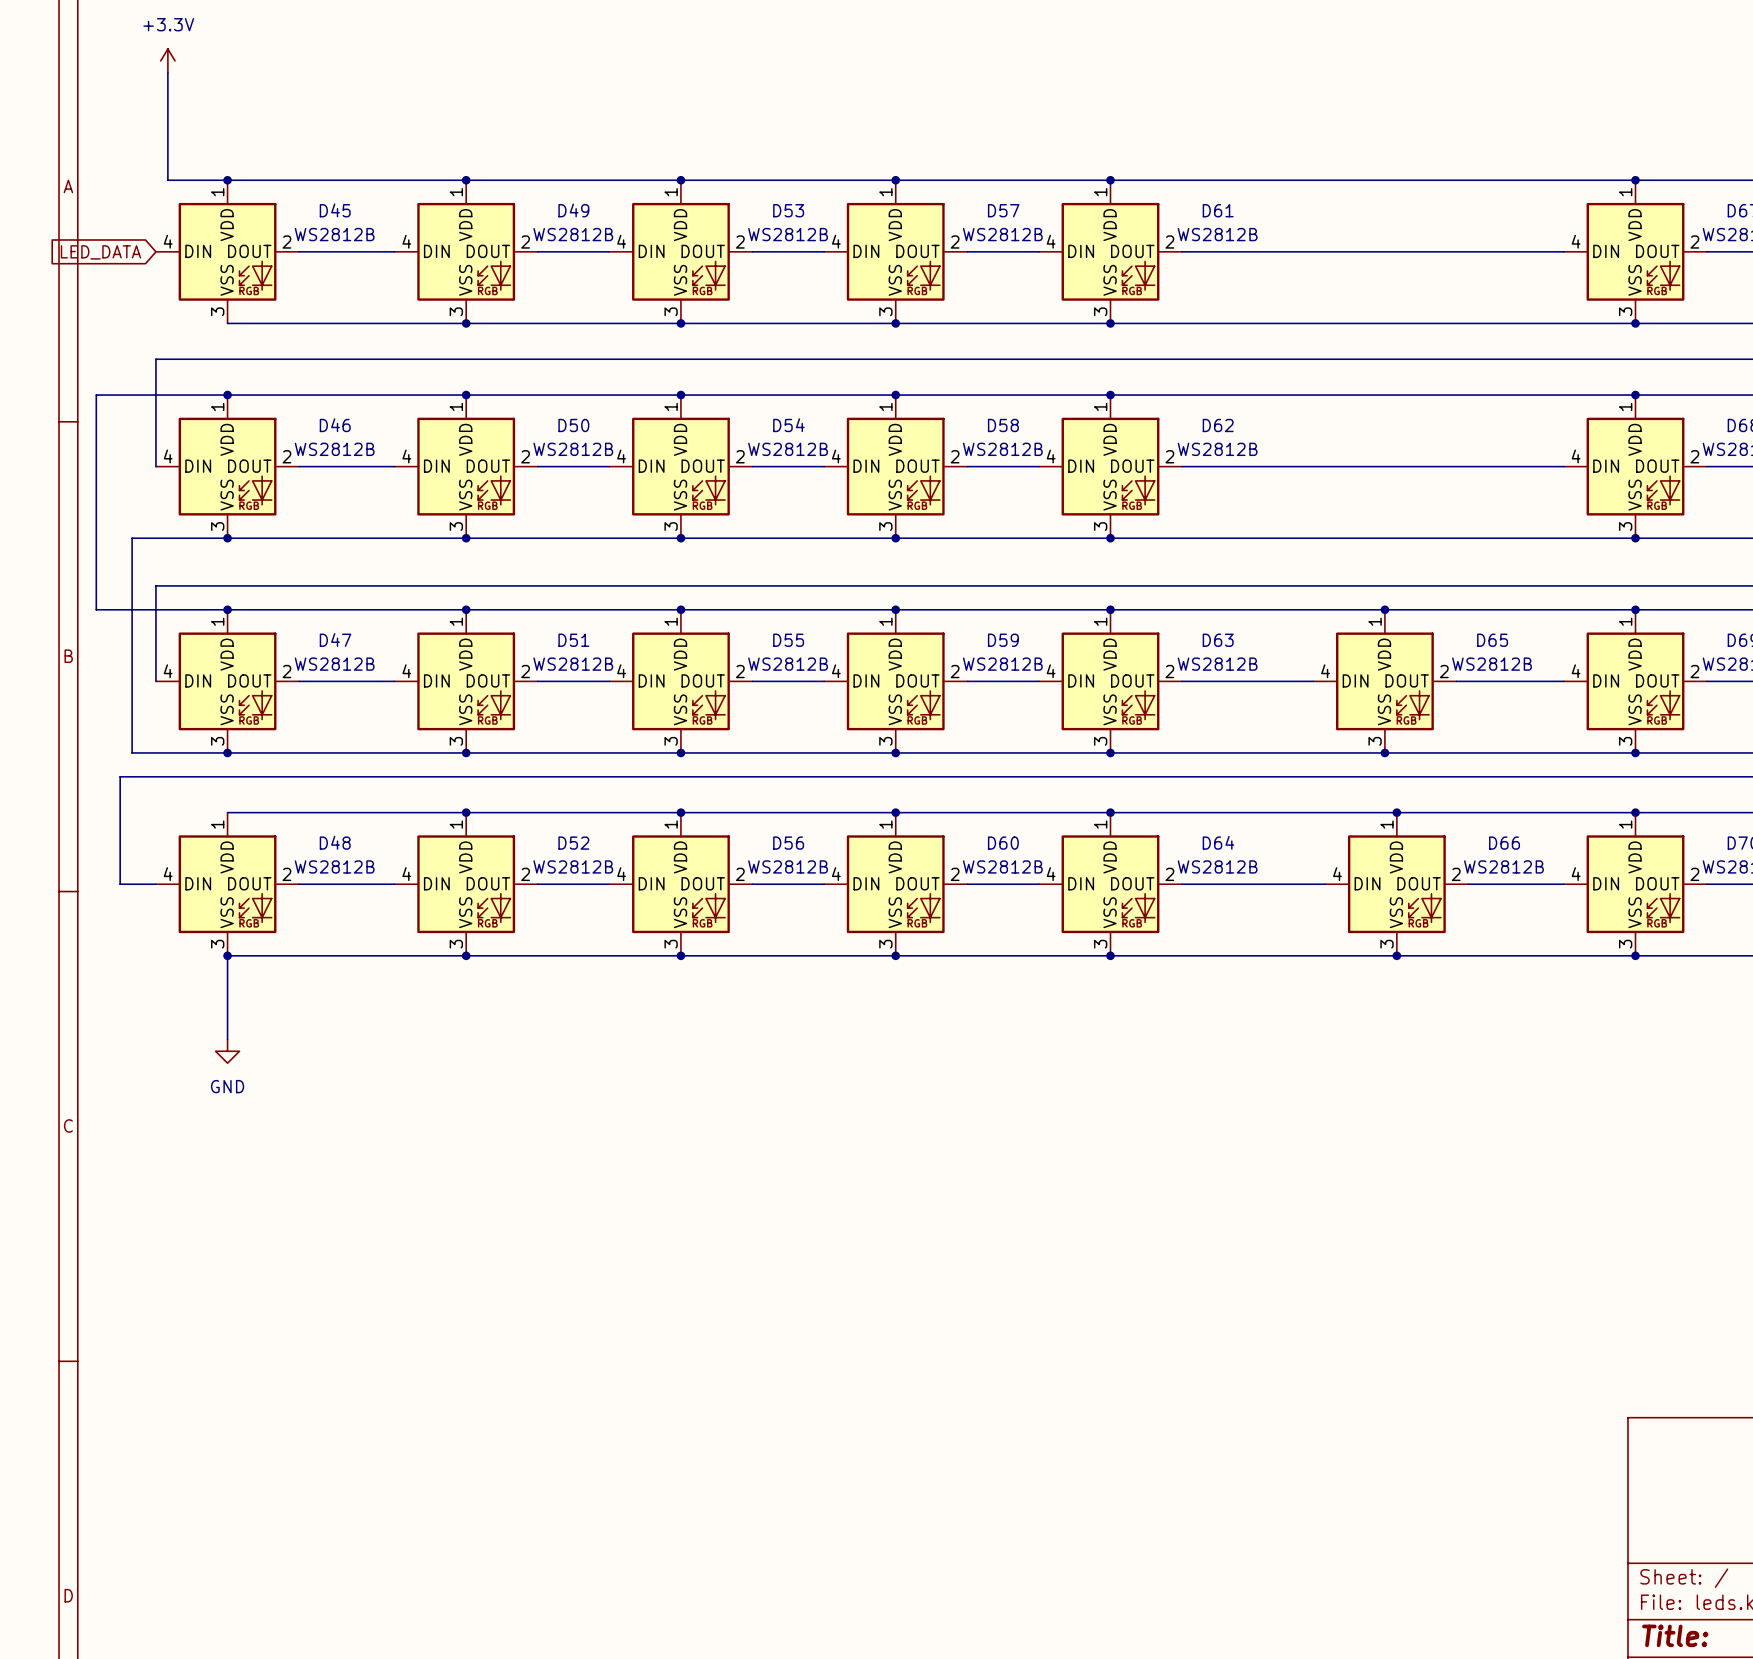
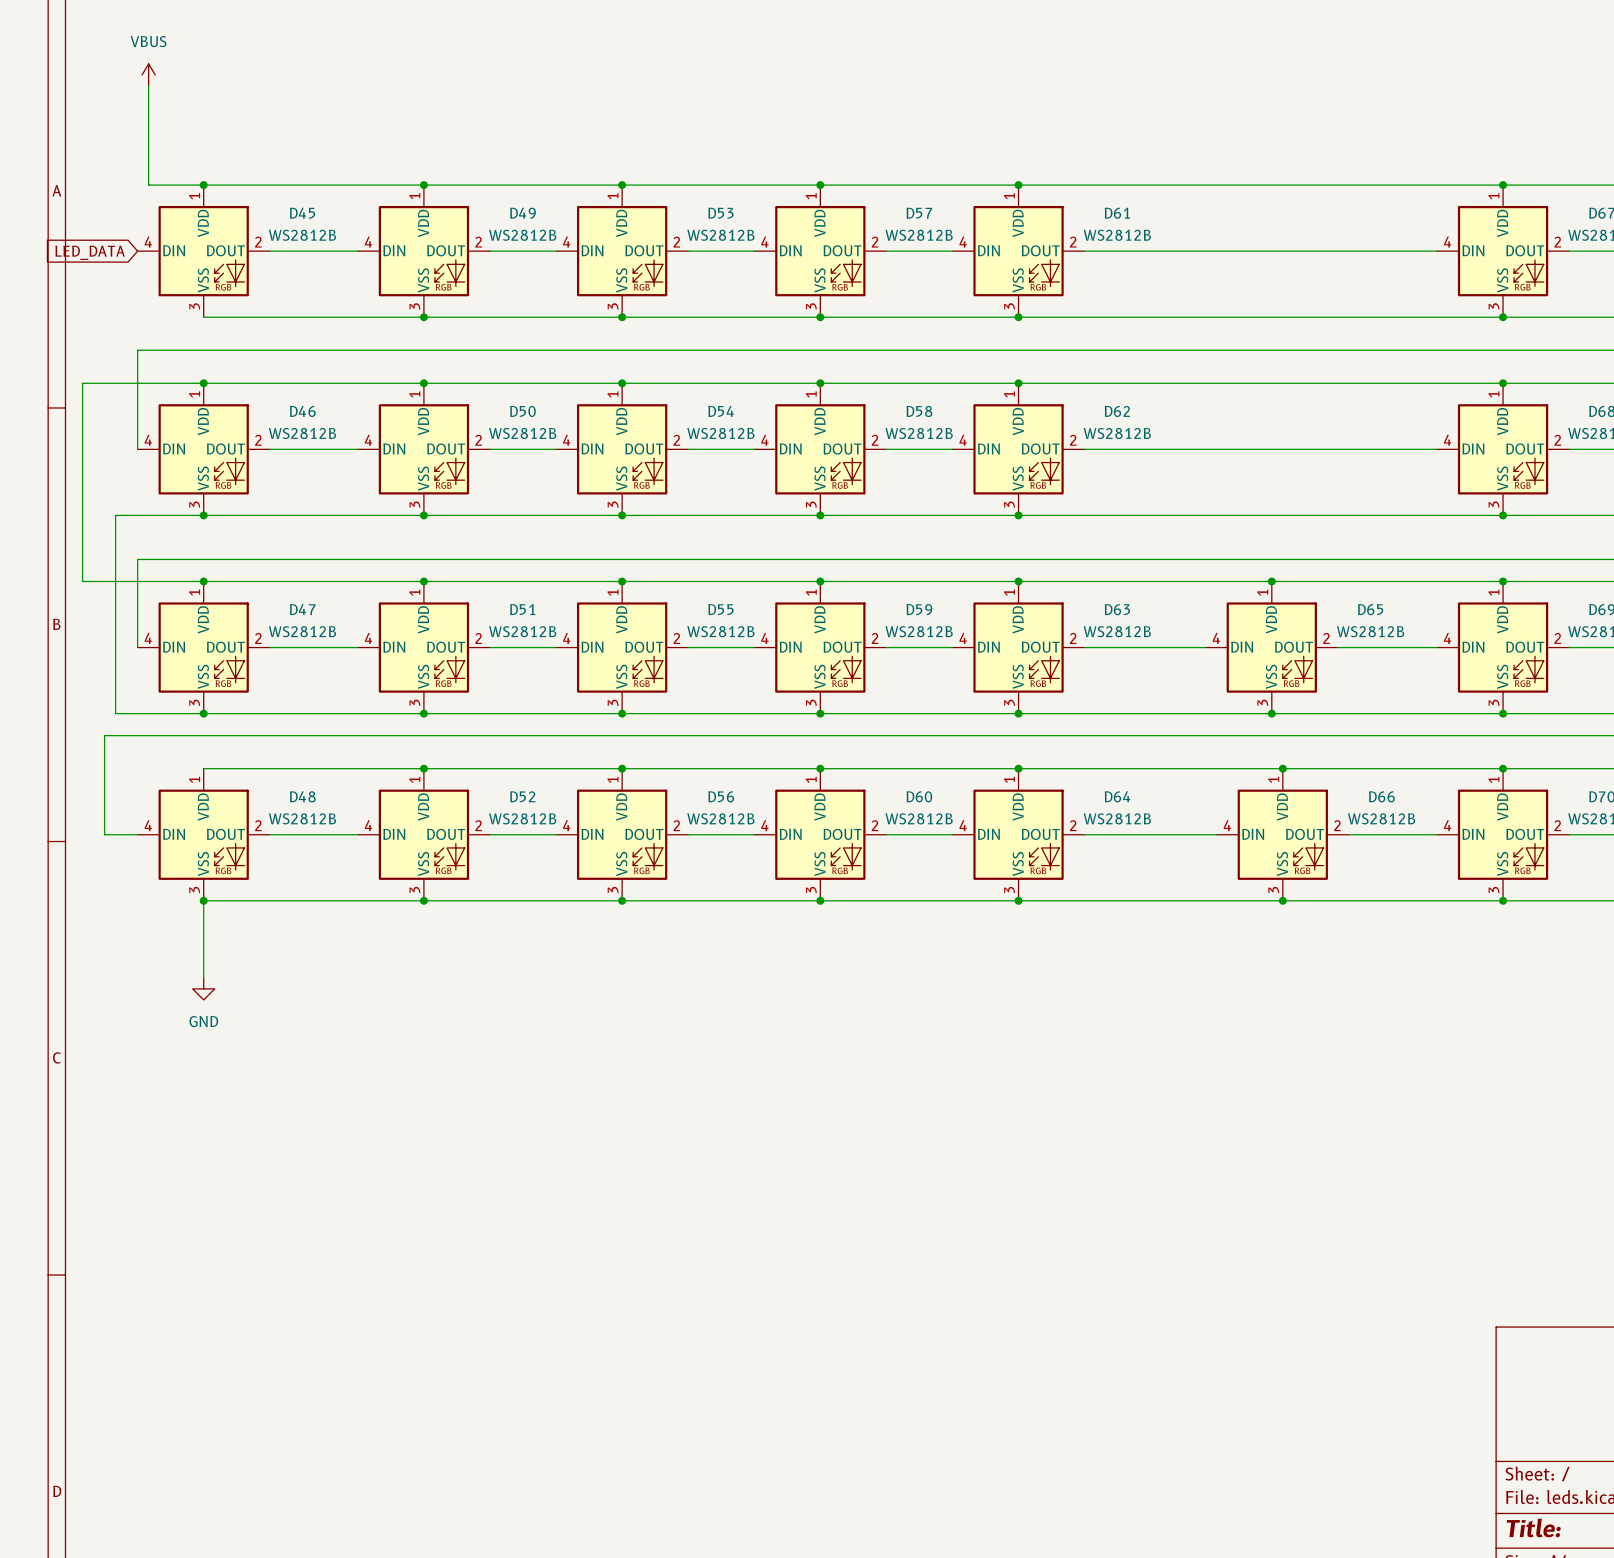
power symbol: +3.3V (167, 60) -> VBUS (148, 74)

